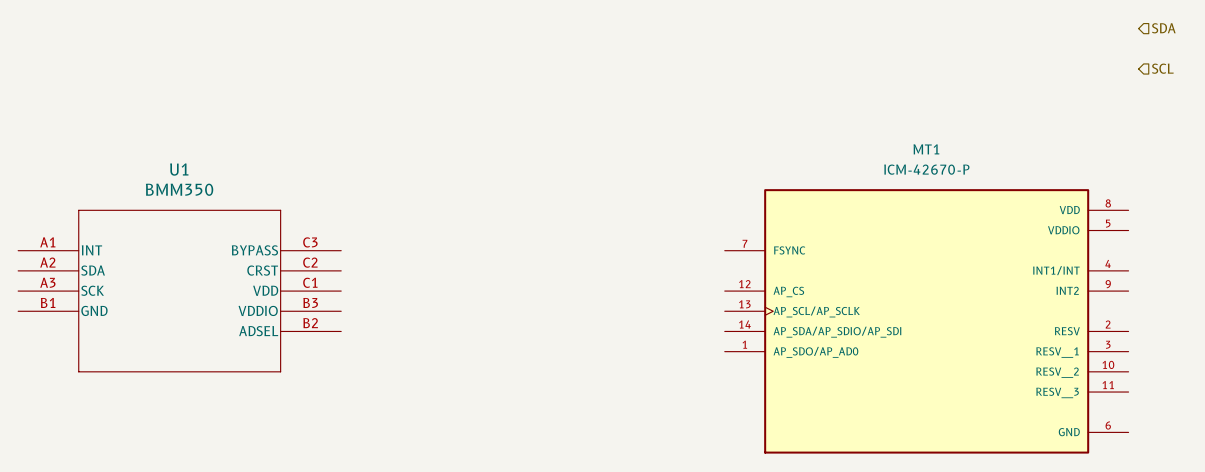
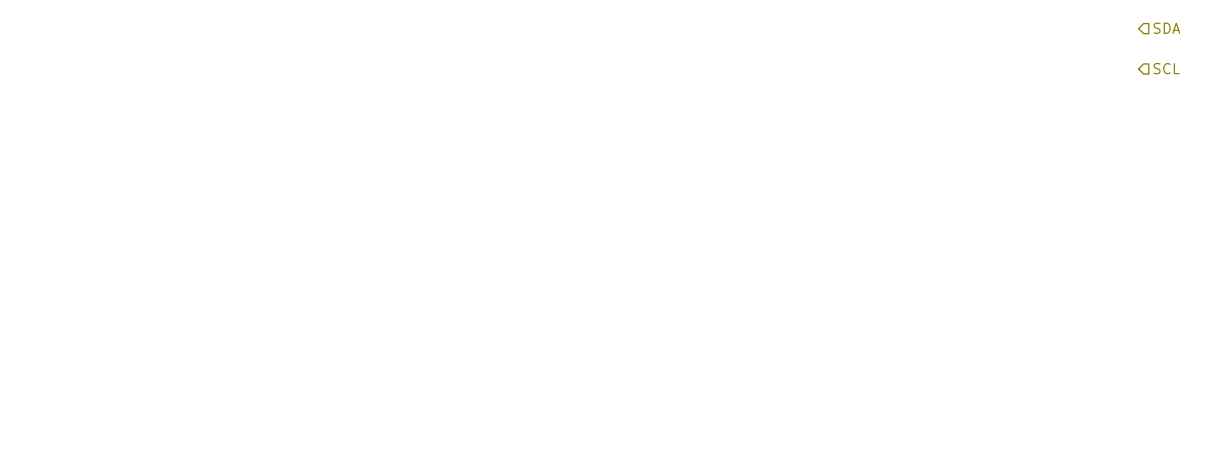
U1: BMM350 (179, 291) -> none
MT1: ICM-42670-P (926, 321) -> none

